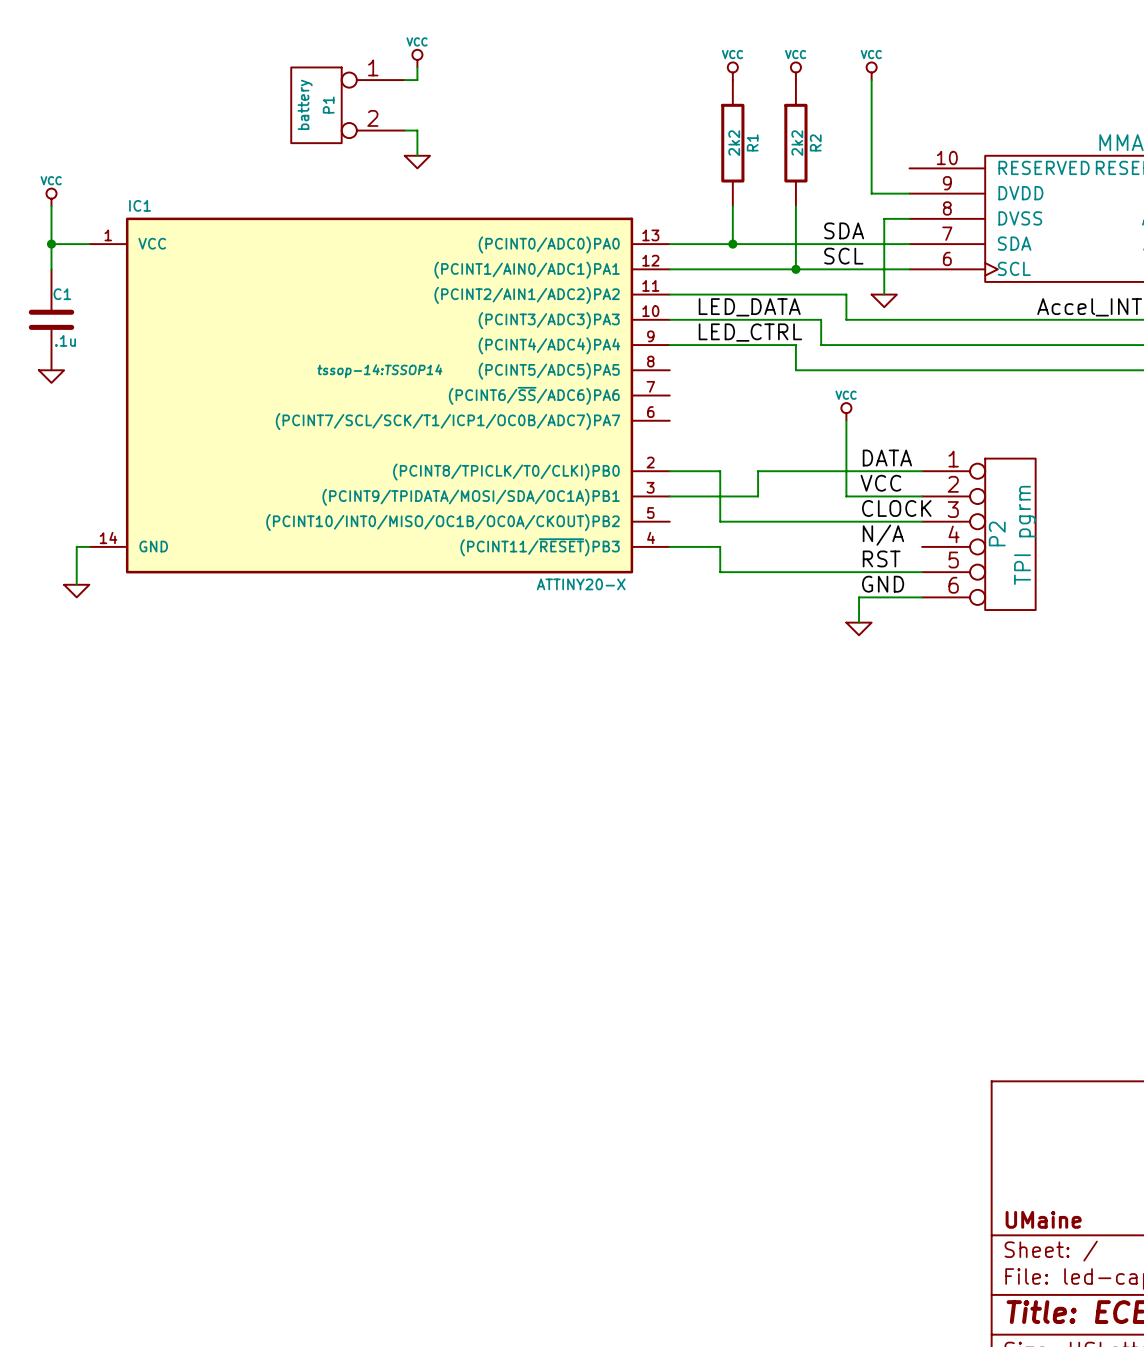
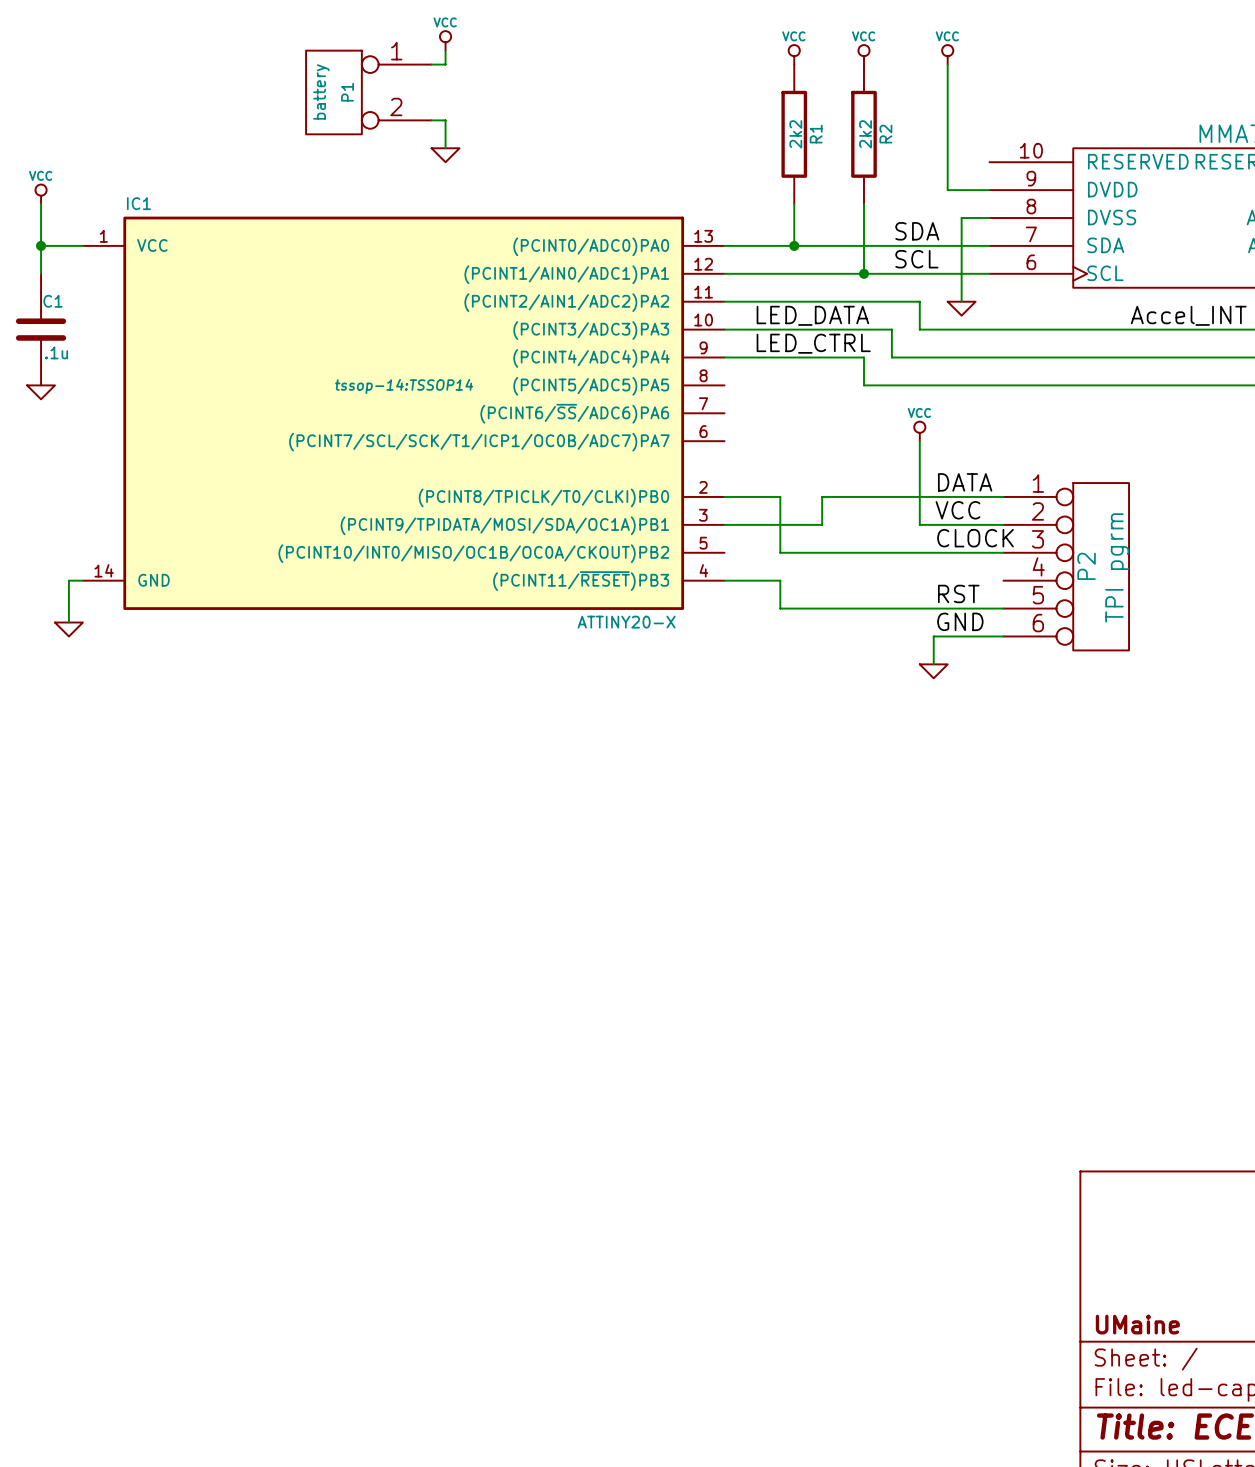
label: N/A (883, 535) -> none

